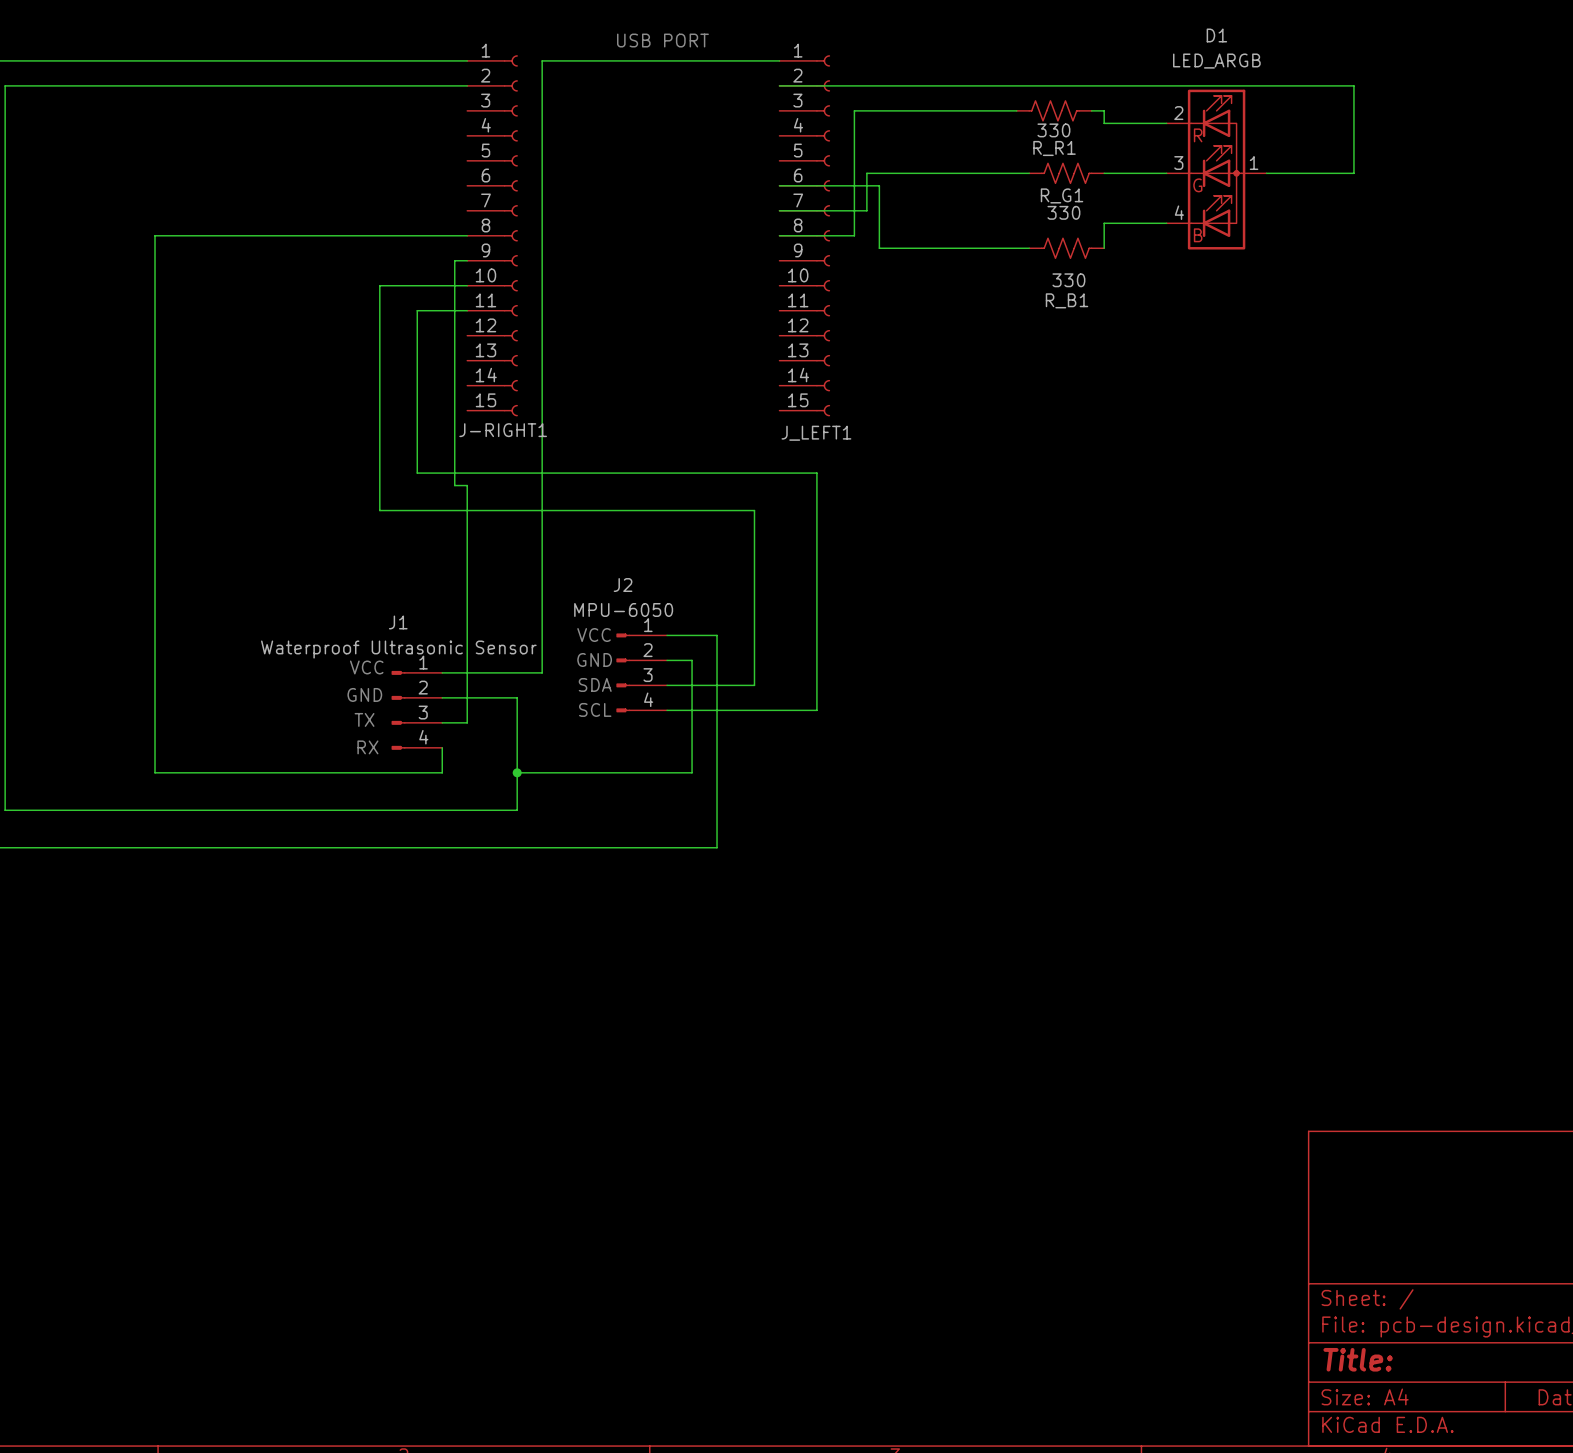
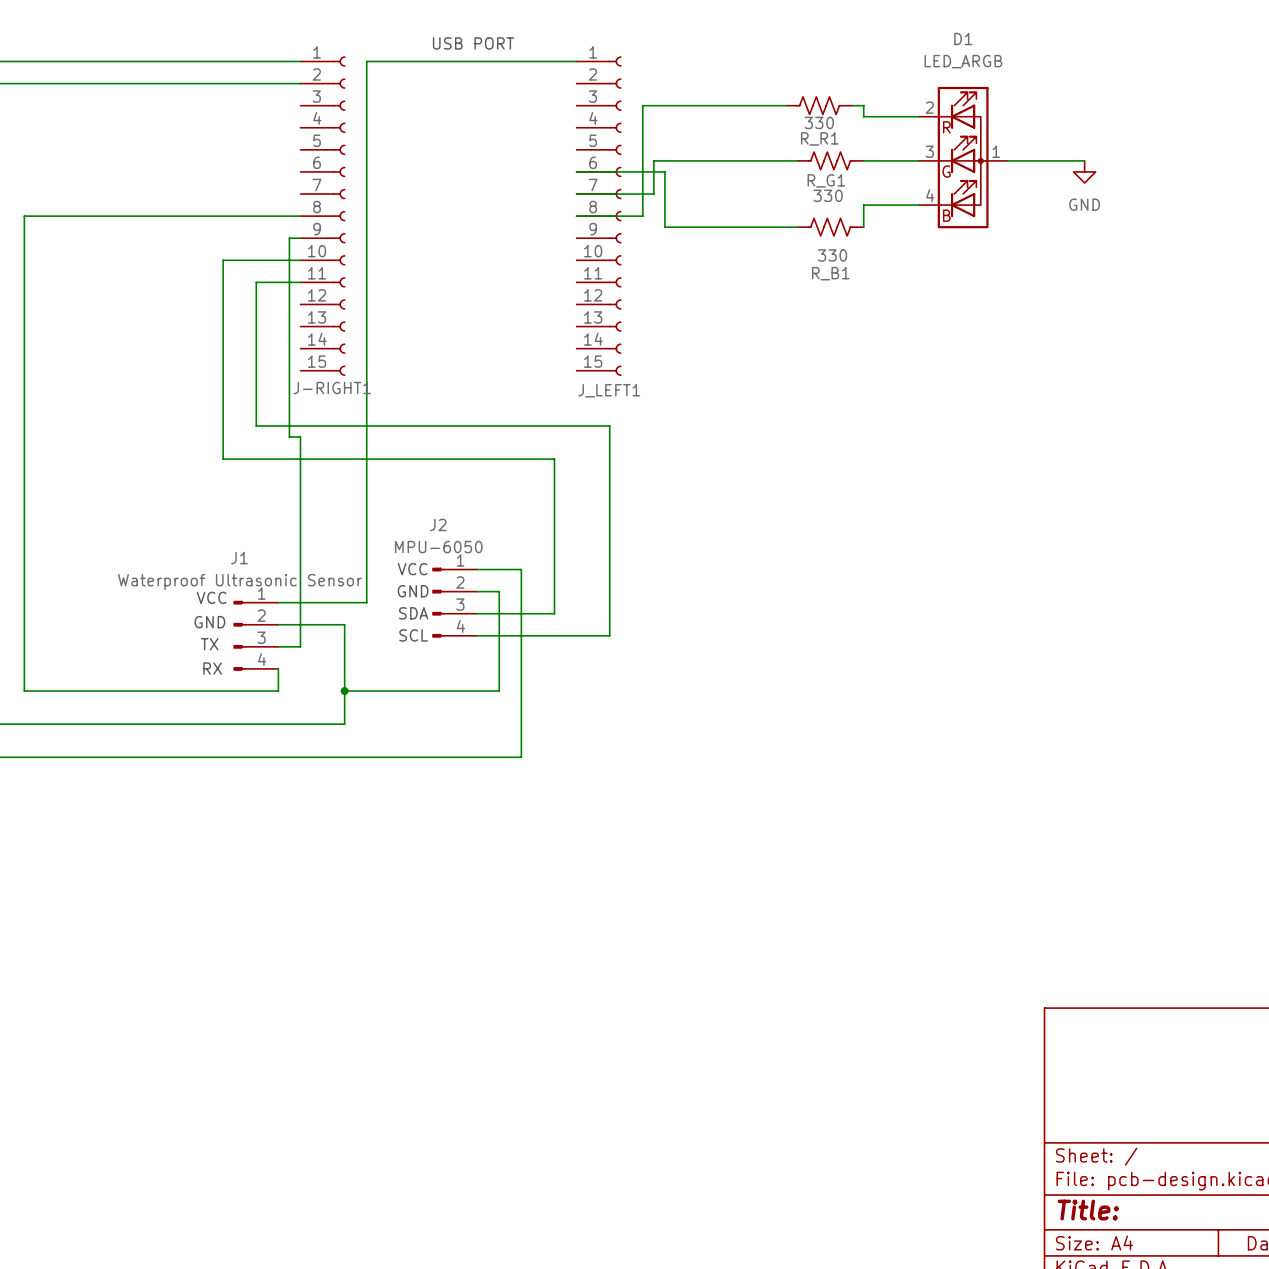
wire: (779, 85) (1353, 85) (1353, 173) -> none
power symbol: none -> GND (1084, 171)

